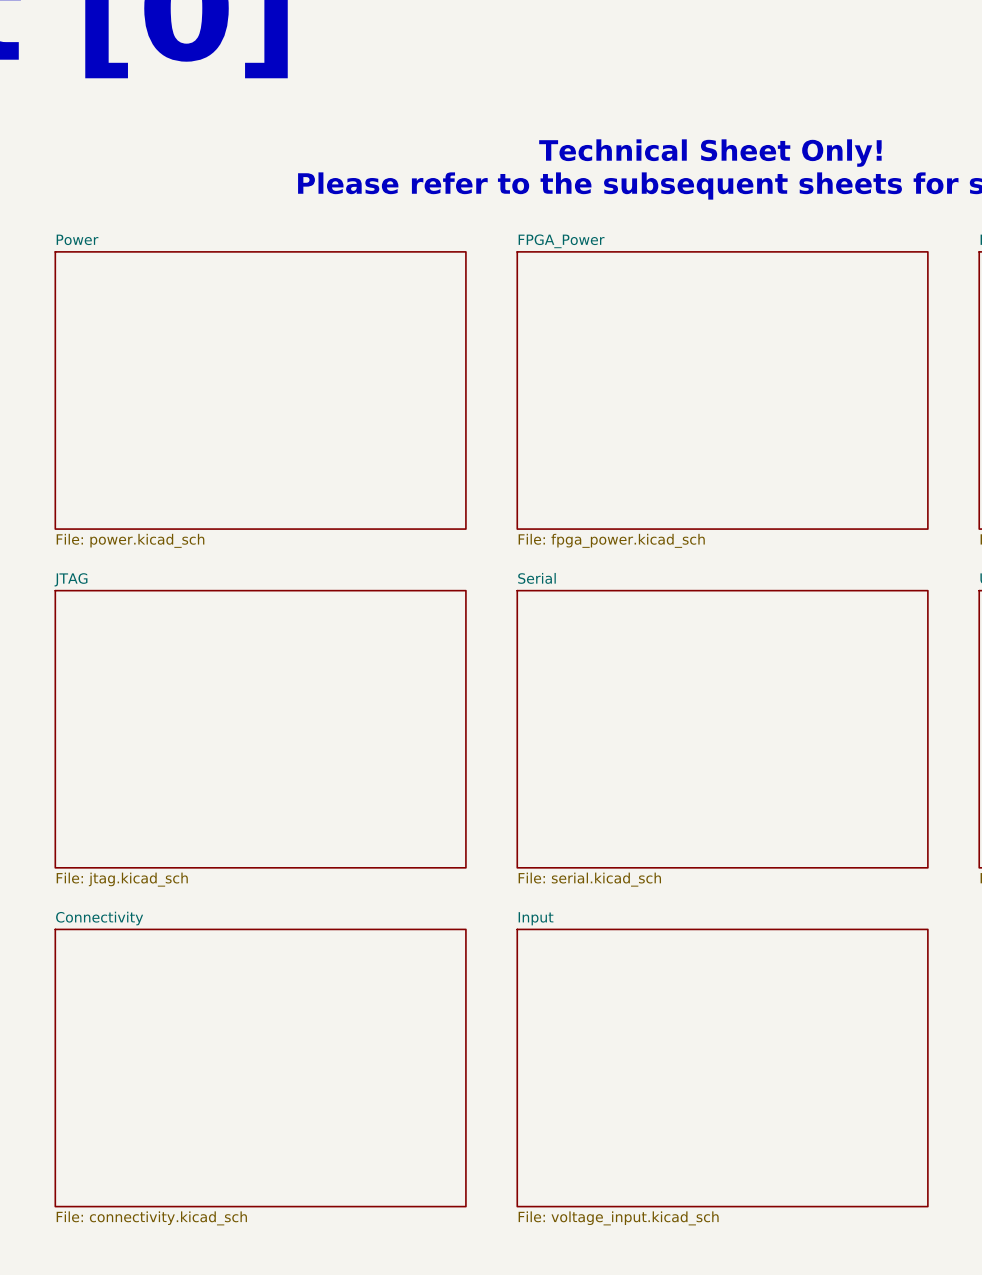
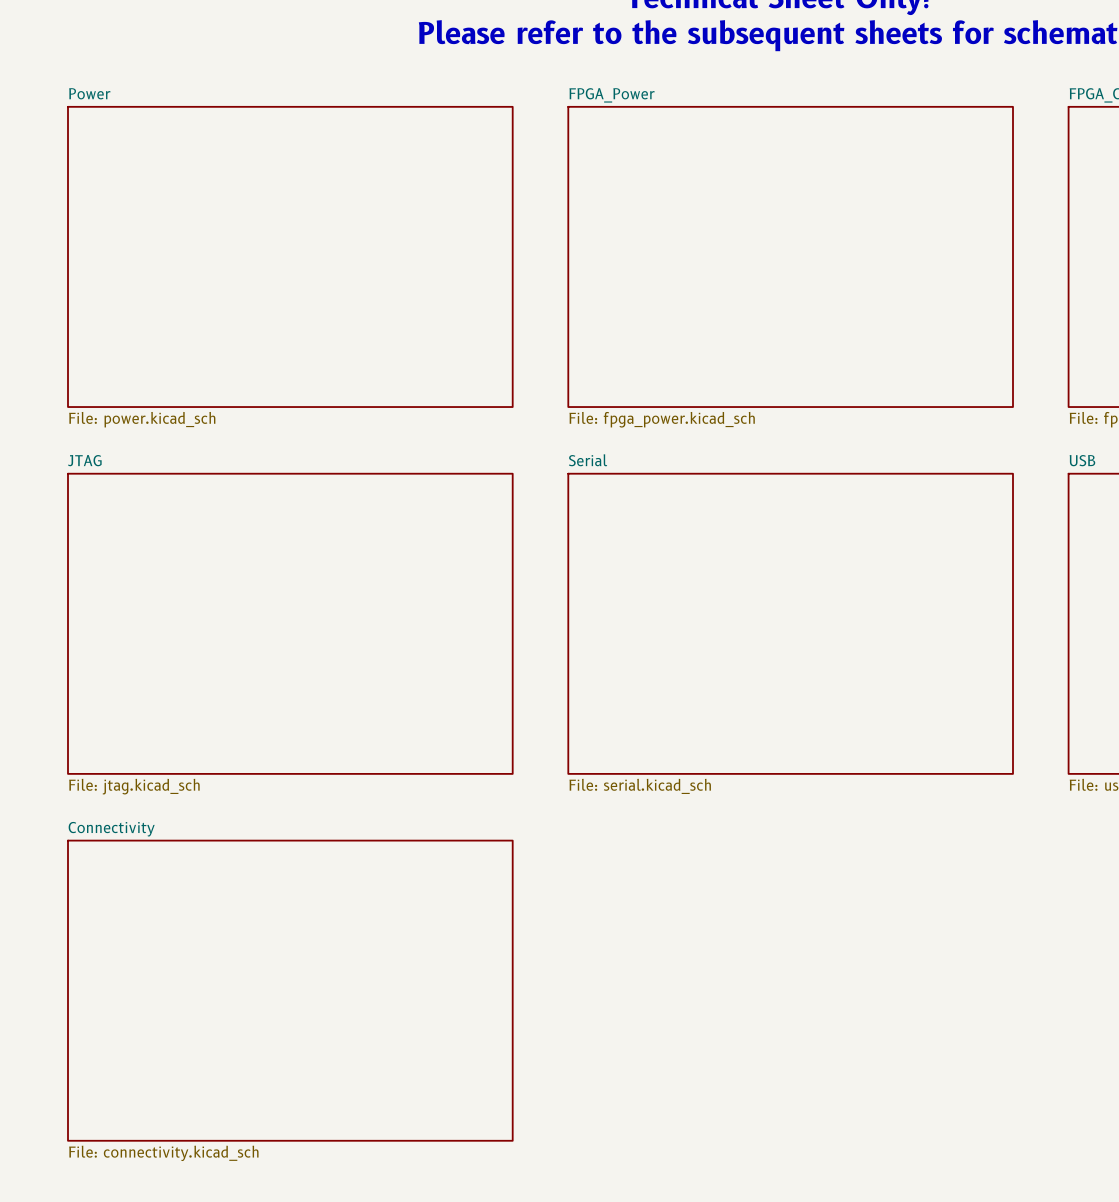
sheet Input: File: voltage_input.kicad_sch (722, 1068) -> none

